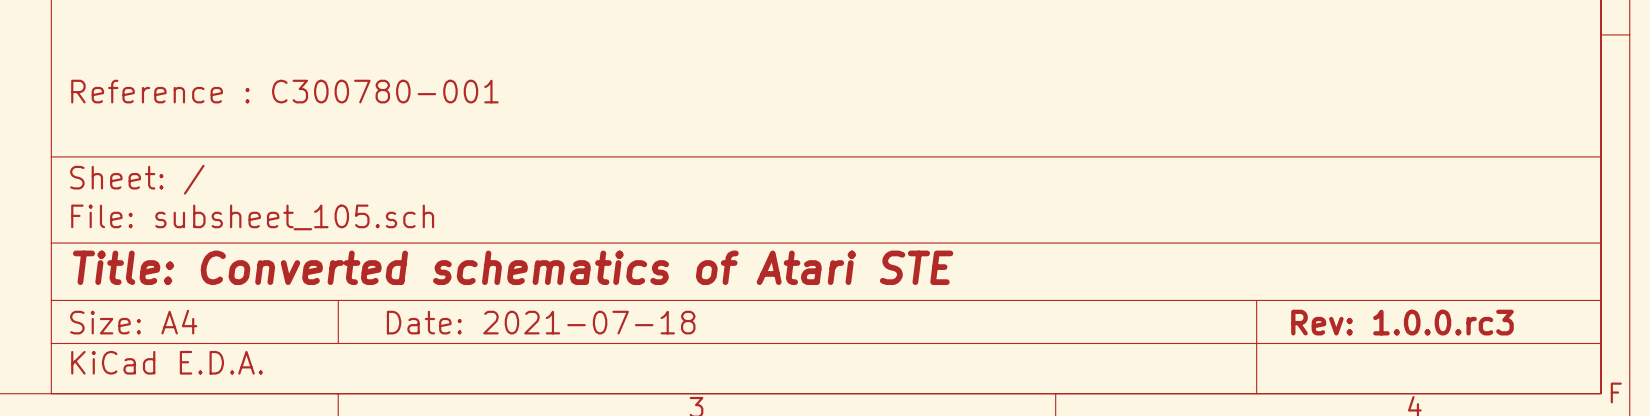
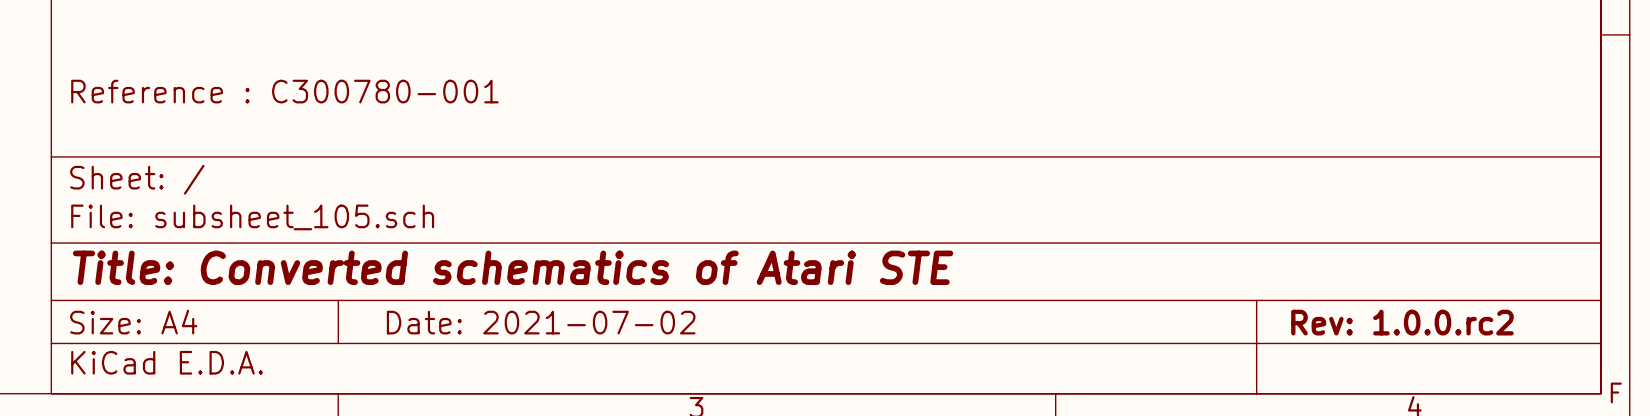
title block: Date: 2021-07-18 (541, 322) -> Date: 2021-07-02 (541, 322)
title block: Rev: 1.0.0.rc3 (1402, 322) -> Rev: 1.0.0.rc2 (1402, 322)

